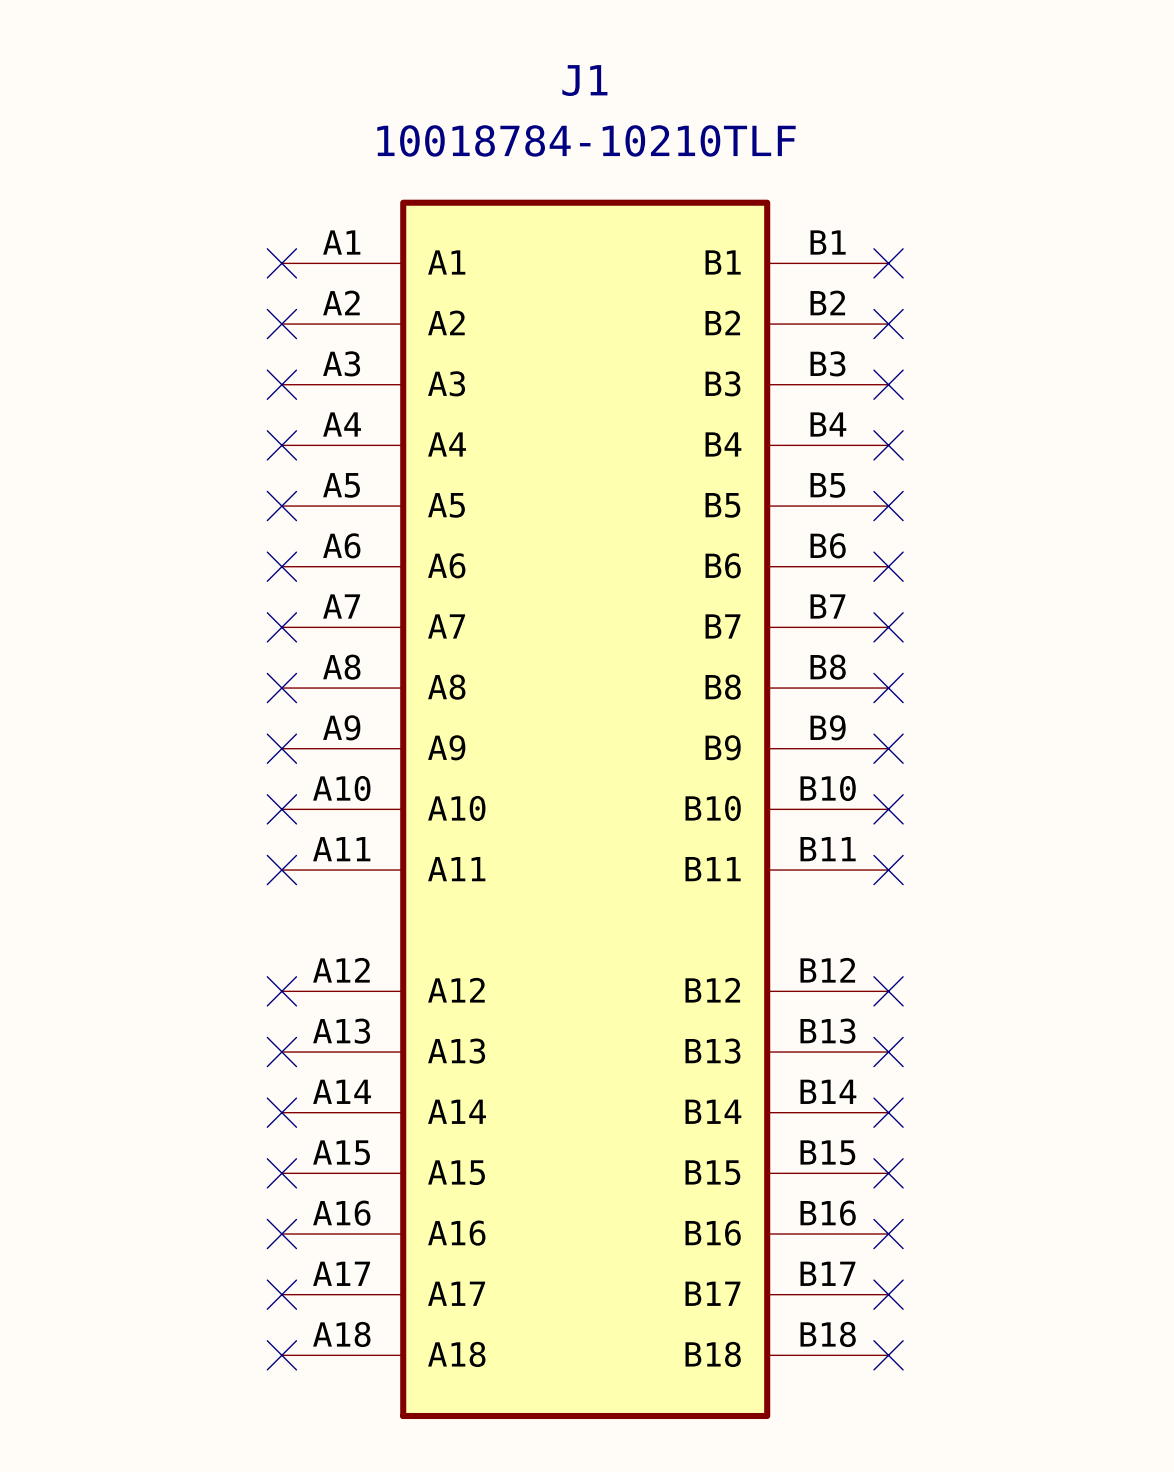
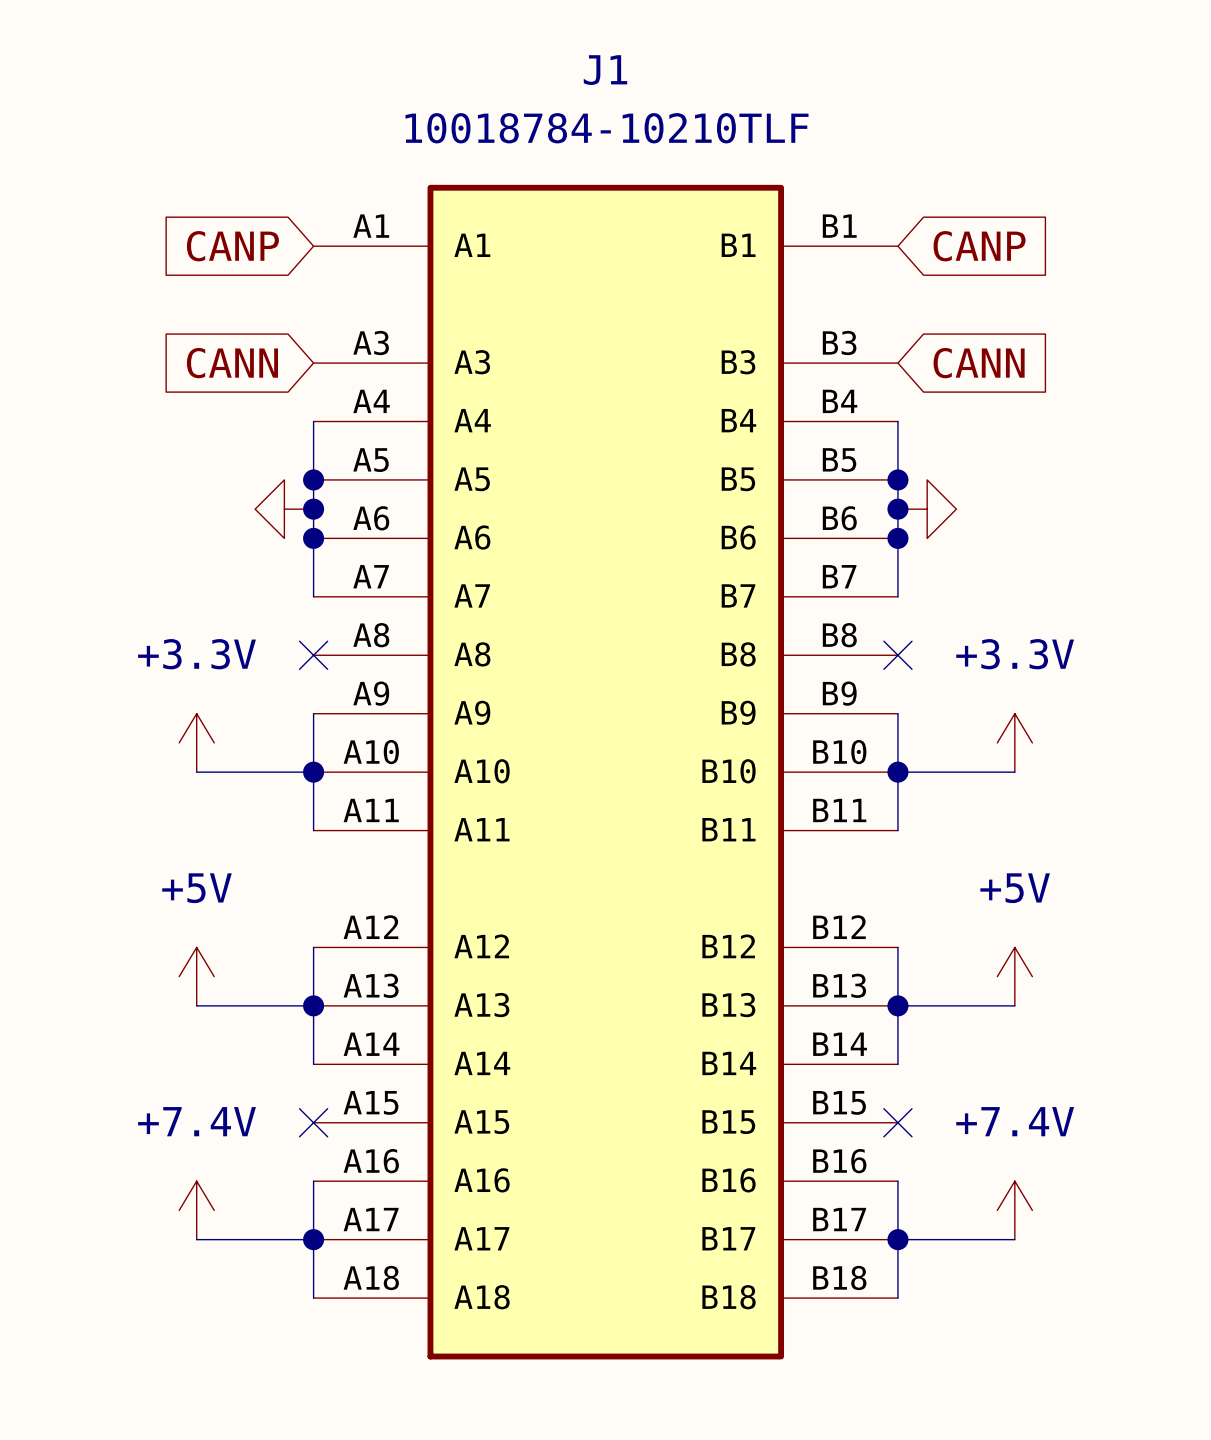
J1 symbol: [281, 199, 889, 1420] -> [313, 184, 898, 1360]
global label: none -> CANP (232, 246)
no-connect mark: (281, 263) -> none
no-connect mark: (888, 263) -> none
global label: none -> CANP (979, 246)
no-connect mark: (281, 324) -> none
no-connect mark: (888, 324) -> none
global label: none -> CANN (232, 363)
no-connect mark: (281, 384) -> none
no-connect mark: (888, 384) -> none
global label: none -> CANN (979, 363)
wire: none -> (313, 421) (313, 596)
no-connect mark: (281, 445) -> none
wire: none -> (897, 421) (897, 596)
no-connect mark: (888, 445) -> none
no-connect mark: (281, 506) -> none
junction: none -> (313, 479)
no-connect mark: (888, 506) -> none
junction: none -> (897, 479)
power symbol: none -> (284, 509)
junction: none -> (313, 509)
junction: none -> (897, 509)
power symbol: none -> (927, 509)
no-connect mark: (281, 566) -> none
junction: none -> (313, 538)
no-connect mark: (888, 566) -> none
junction: none -> (897, 538)
no-connect mark: (281, 627) -> none
no-connect mark: (888, 627) -> none
wire: none -> (313, 713) (313, 830)
no-connect mark: (281, 748) -> none
wire: none -> (897, 713) (897, 830)
no-connect mark: (888, 748) -> none
power symbol: none -> +3.3V (196, 742)
power symbol: none -> +3.3V (1014, 742)
wire: none -> (196, 772) (313, 772)
no-connect mark: (281, 809) -> none
junction: none -> (313, 772)
wire: none -> (897, 772) (1014, 772)
no-connect mark: (888, 809) -> none
junction: none -> (897, 772)
no-connect mark: (281, 870) -> none
no-connect mark: (888, 870) -> none
wire: none -> (313, 947) (313, 1064)
no-connect mark: (281, 991) -> none
wire: none -> (897, 947) (897, 1064)
no-connect mark: (888, 991) -> none
power symbol: none -> +5V (196, 976)
power symbol: none -> +5V (1014, 976)
wire: none -> (196, 1005) (313, 1005)
no-connect mark: (281, 1052) -> none
junction: none -> (313, 1005)
wire: none -> (897, 1005) (1014, 1005)
no-connect mark: (888, 1052) -> none
junction: none -> (897, 1005)
no-connect mark: (281, 1112) -> none
no-connect mark: (888, 1112) -> none
wire: none -> (313, 1181) (313, 1298)
no-connect mark: (281, 1234) -> none
wire: none -> (897, 1181) (897, 1298)
no-connect mark: (888, 1234) -> none
power symbol: none -> +7.4V (196, 1210)
power symbol: none -> +7.4V (1014, 1210)
wire: none -> (196, 1239) (313, 1239)
no-connect mark: (281, 1294) -> none
junction: none -> (313, 1239)
wire: none -> (897, 1239) (1014, 1239)
no-connect mark: (888, 1294) -> none
junction: none -> (897, 1239)
no-connect mark: (281, 1355) -> none
no-connect mark: (888, 1355) -> none

